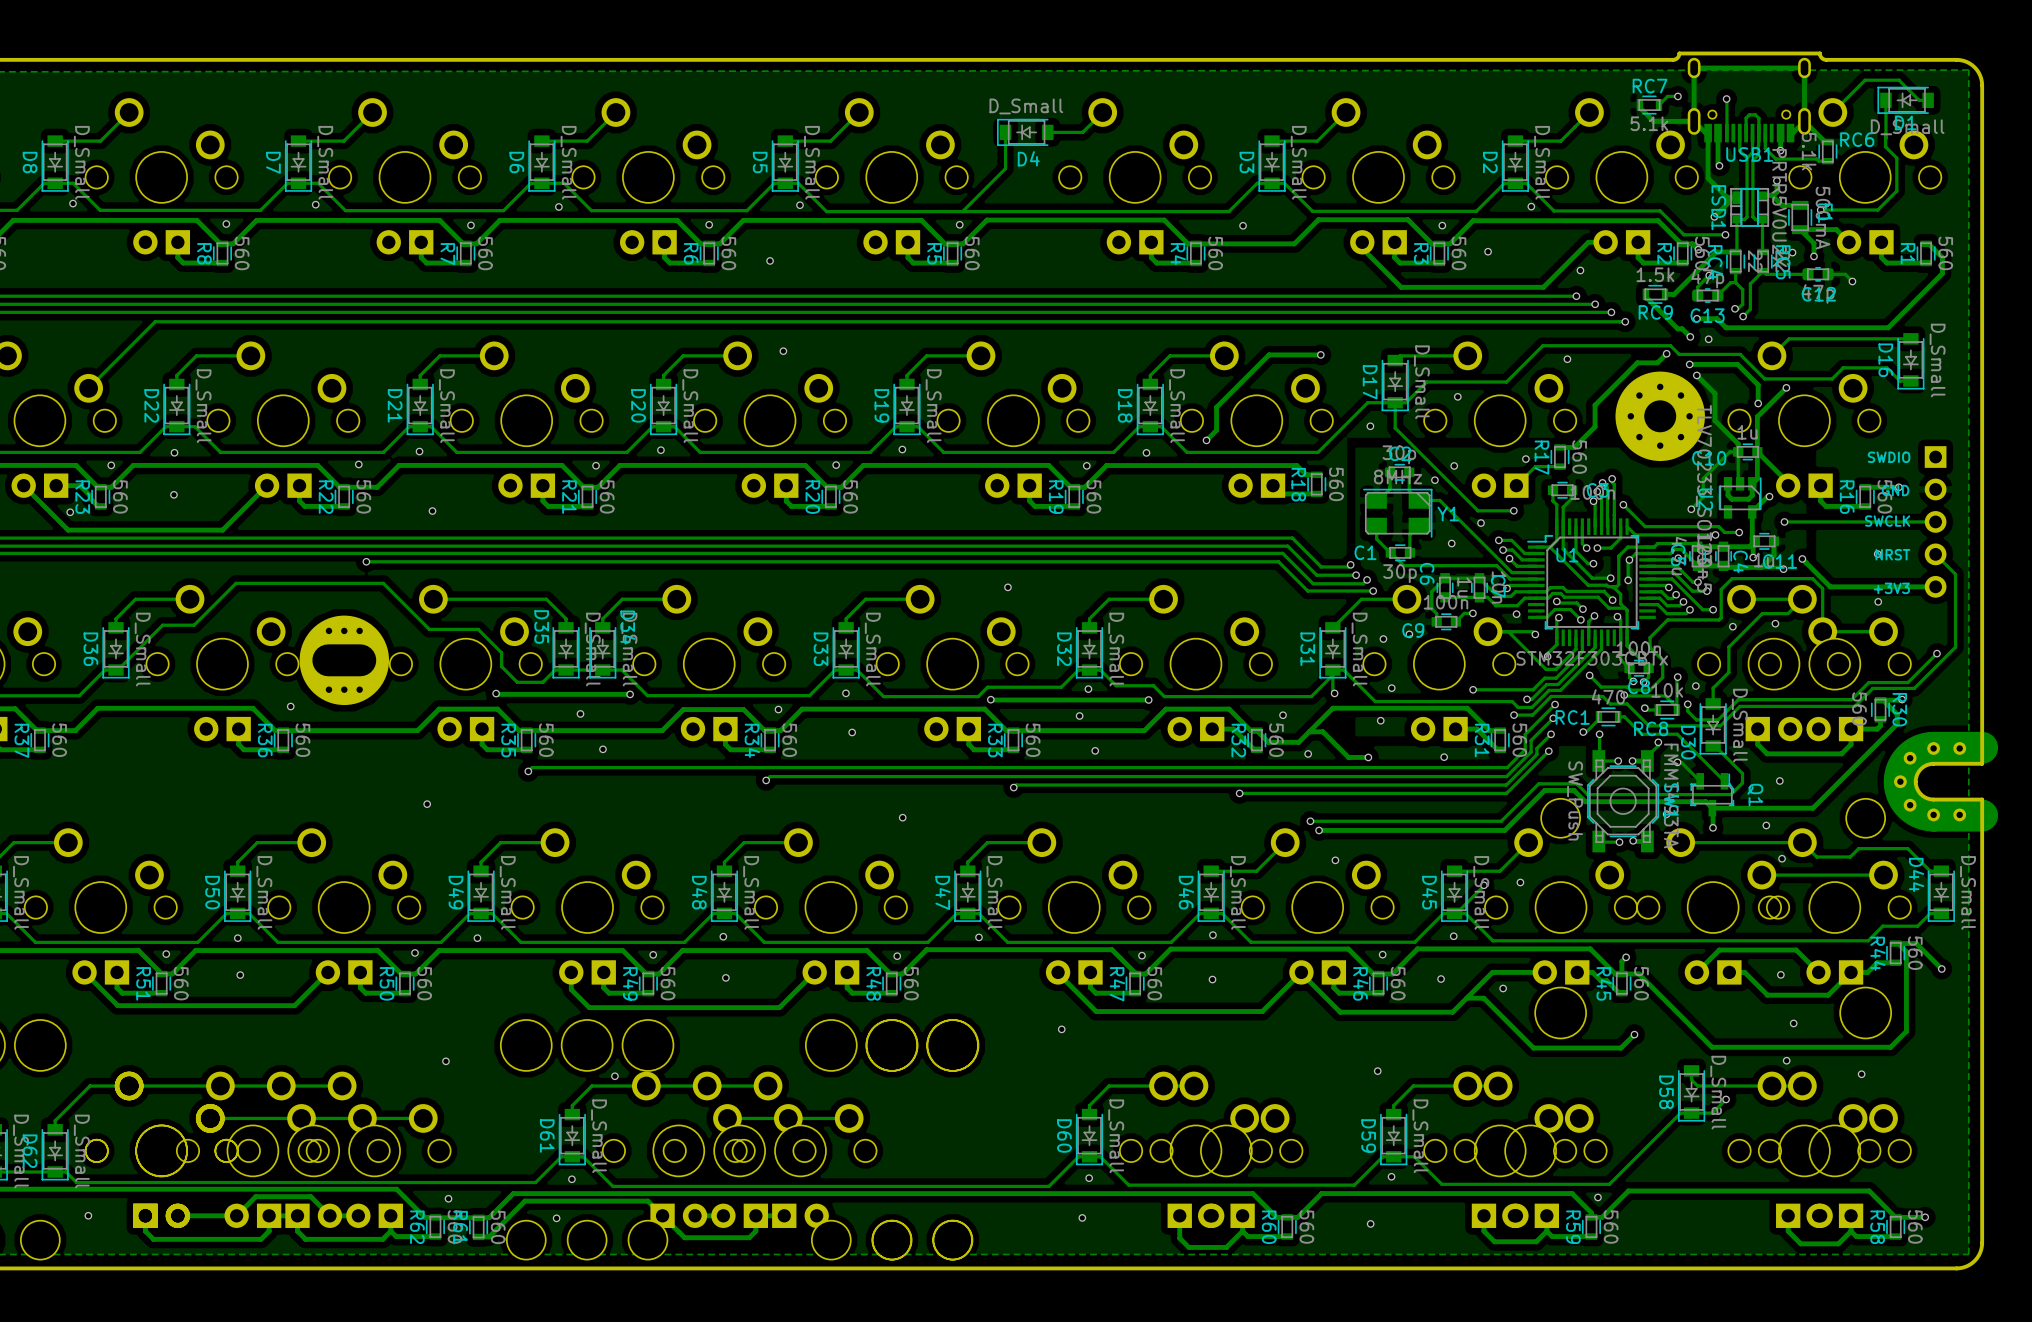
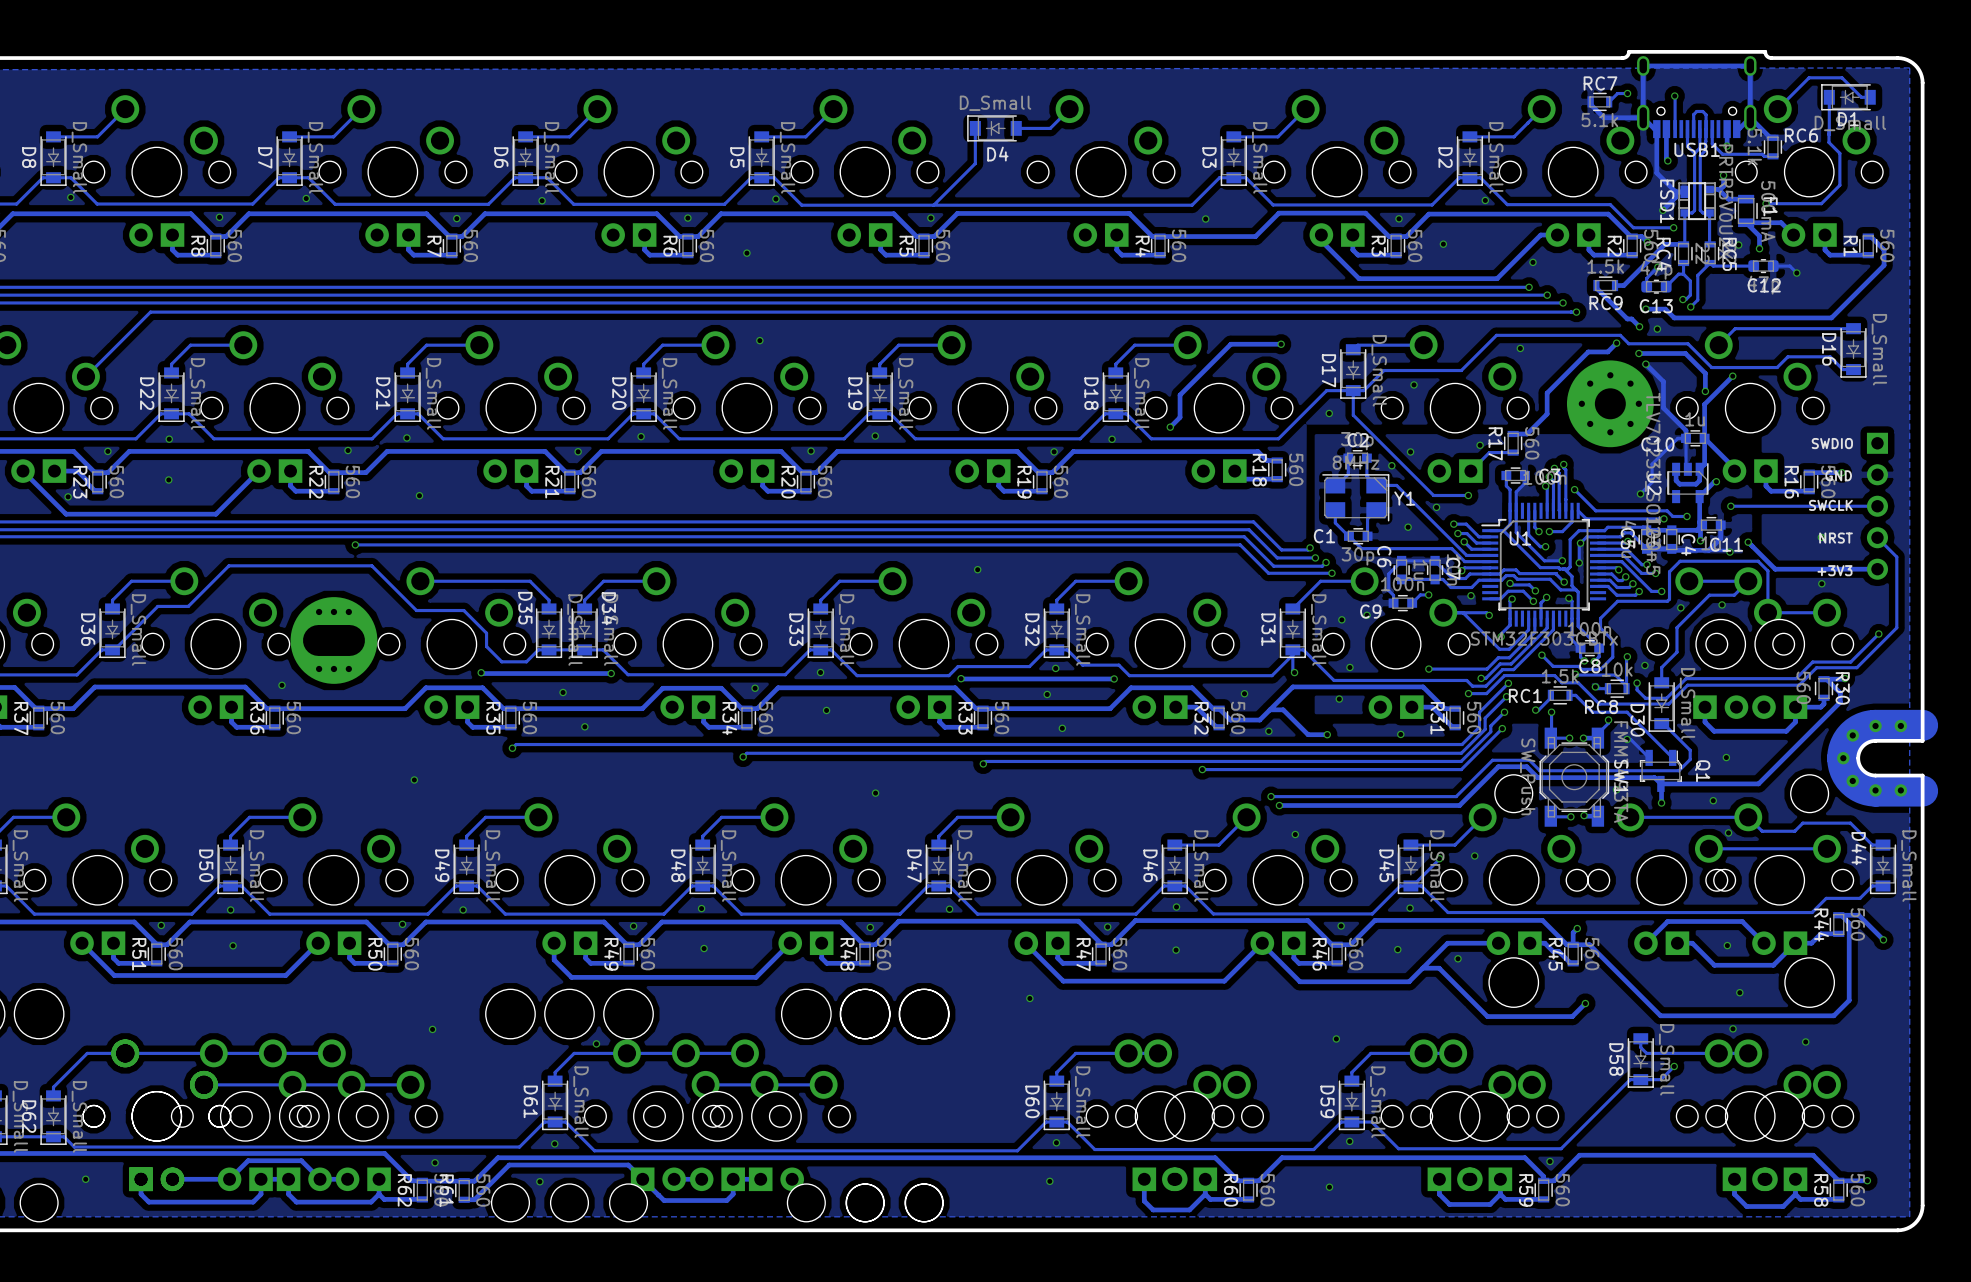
RC1 value: 470 (1608, 696) -> 1.5k (1560, 676)

